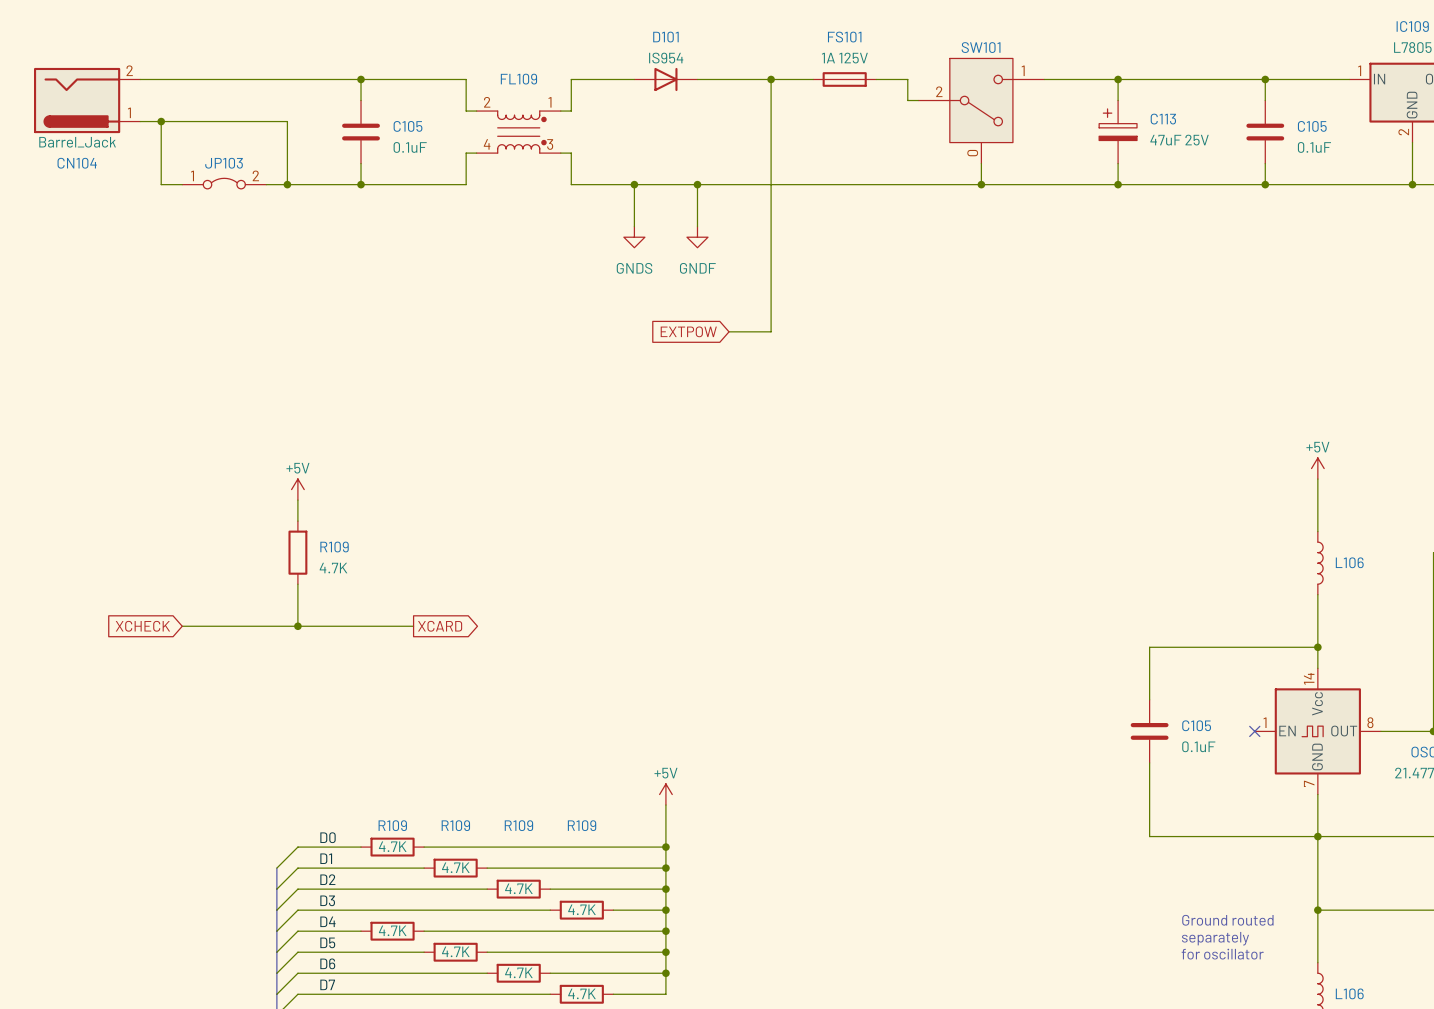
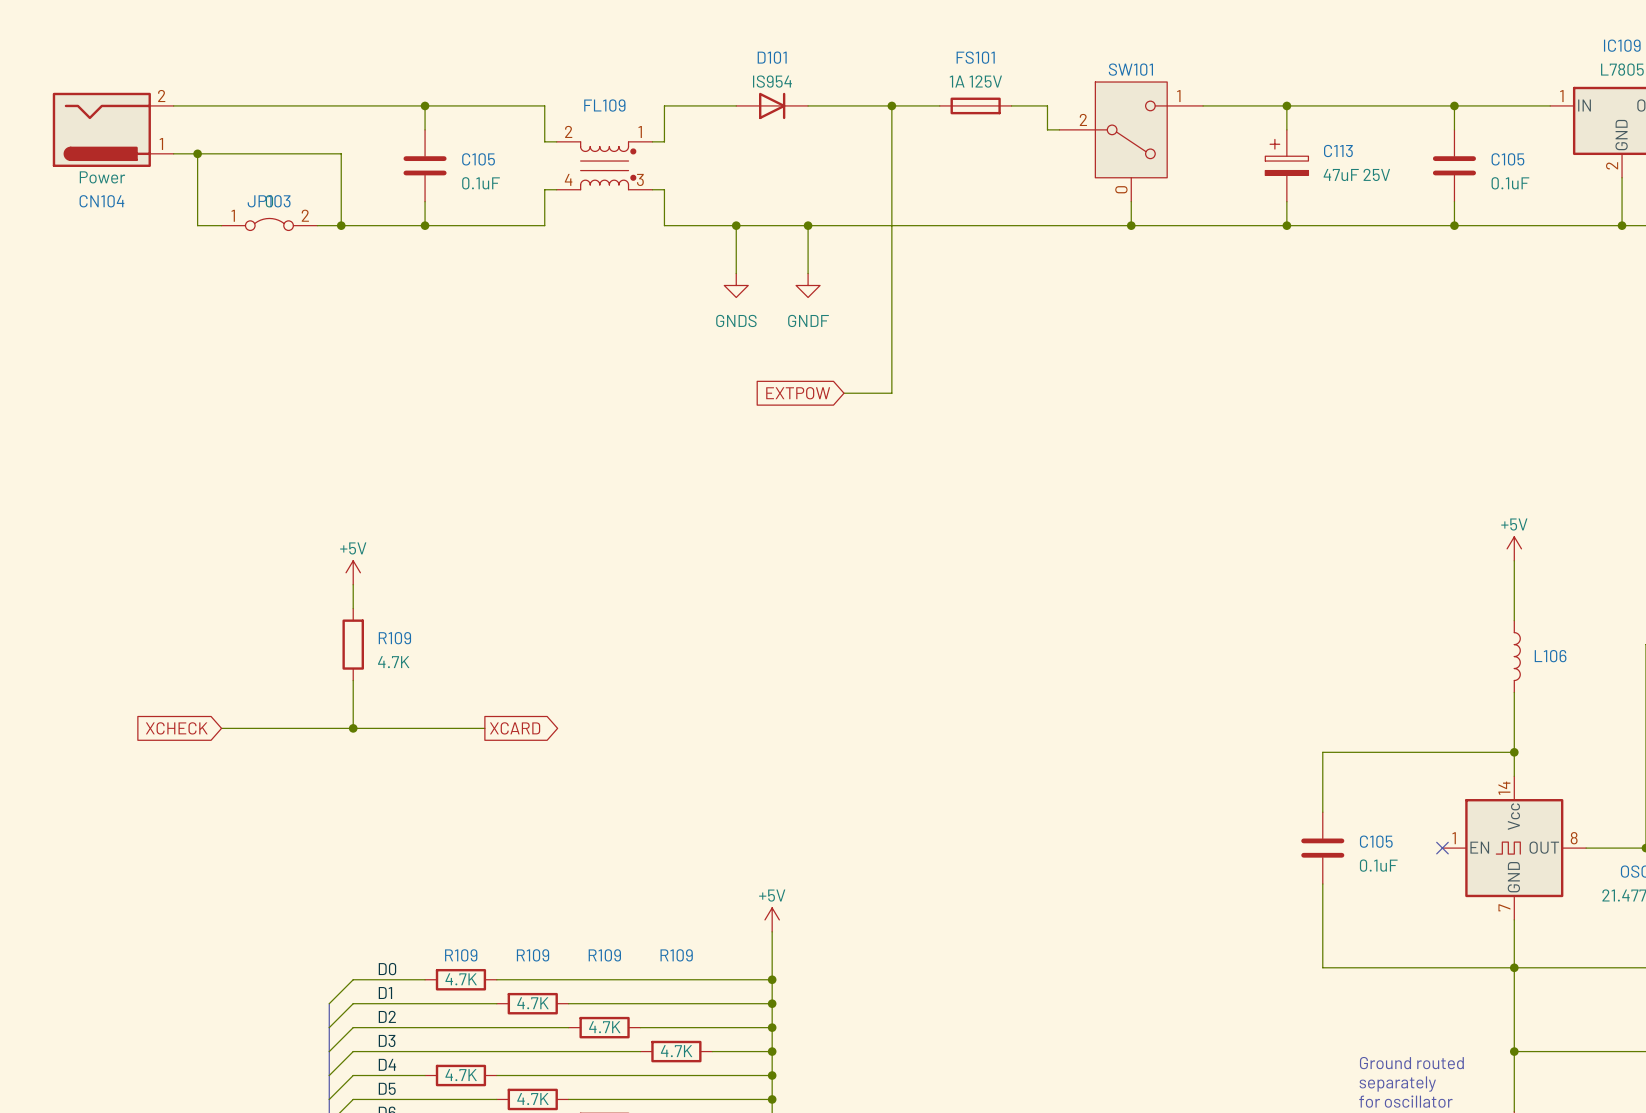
CN104 value: Barrel_Jack (77, 142) -> Power (102, 177)
JP103 value: none -> 0 (269, 201)

